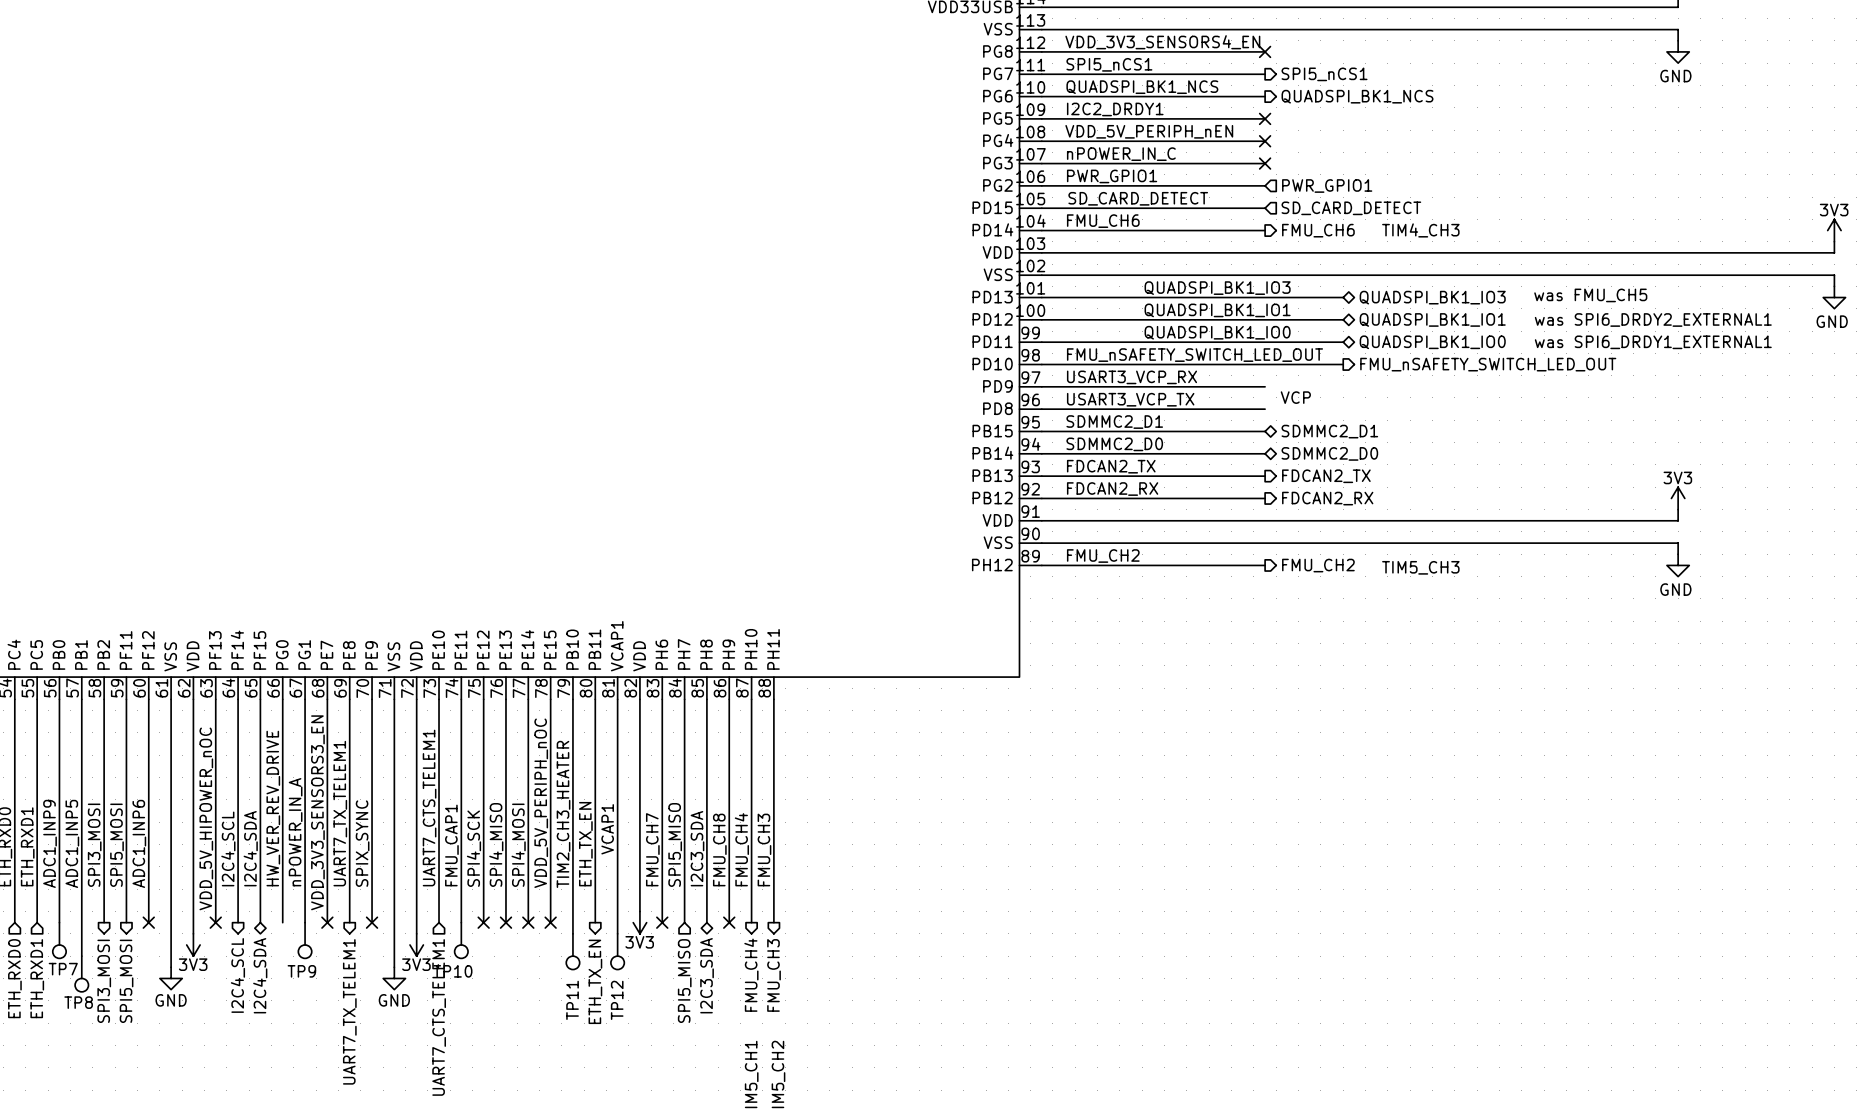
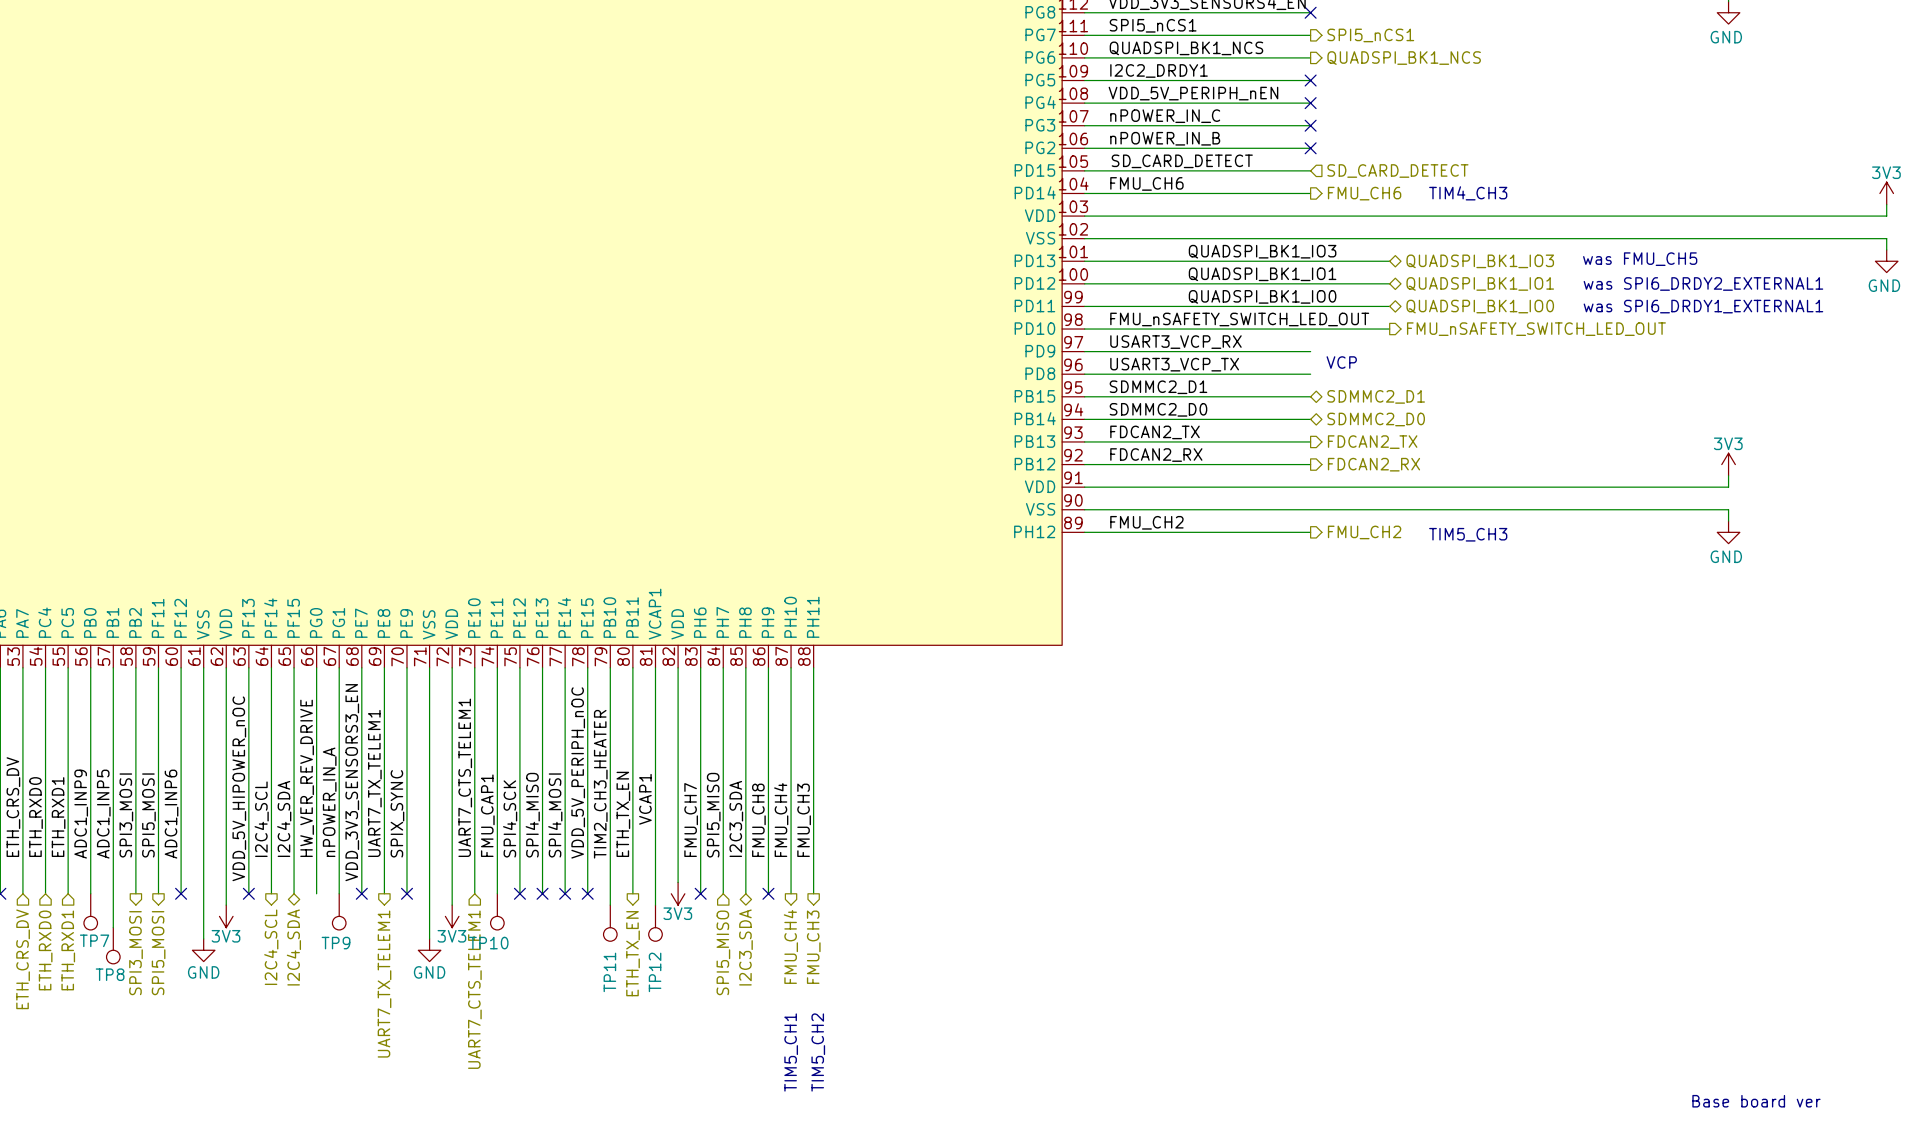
label: PWR_GPIO1 (1112, 176) -> nPOWER_IN_B (1165, 138)
no-connect mark: none -> (1310, 148)
hierarchical label: PWR_GPIO1 (1327, 186) -> none

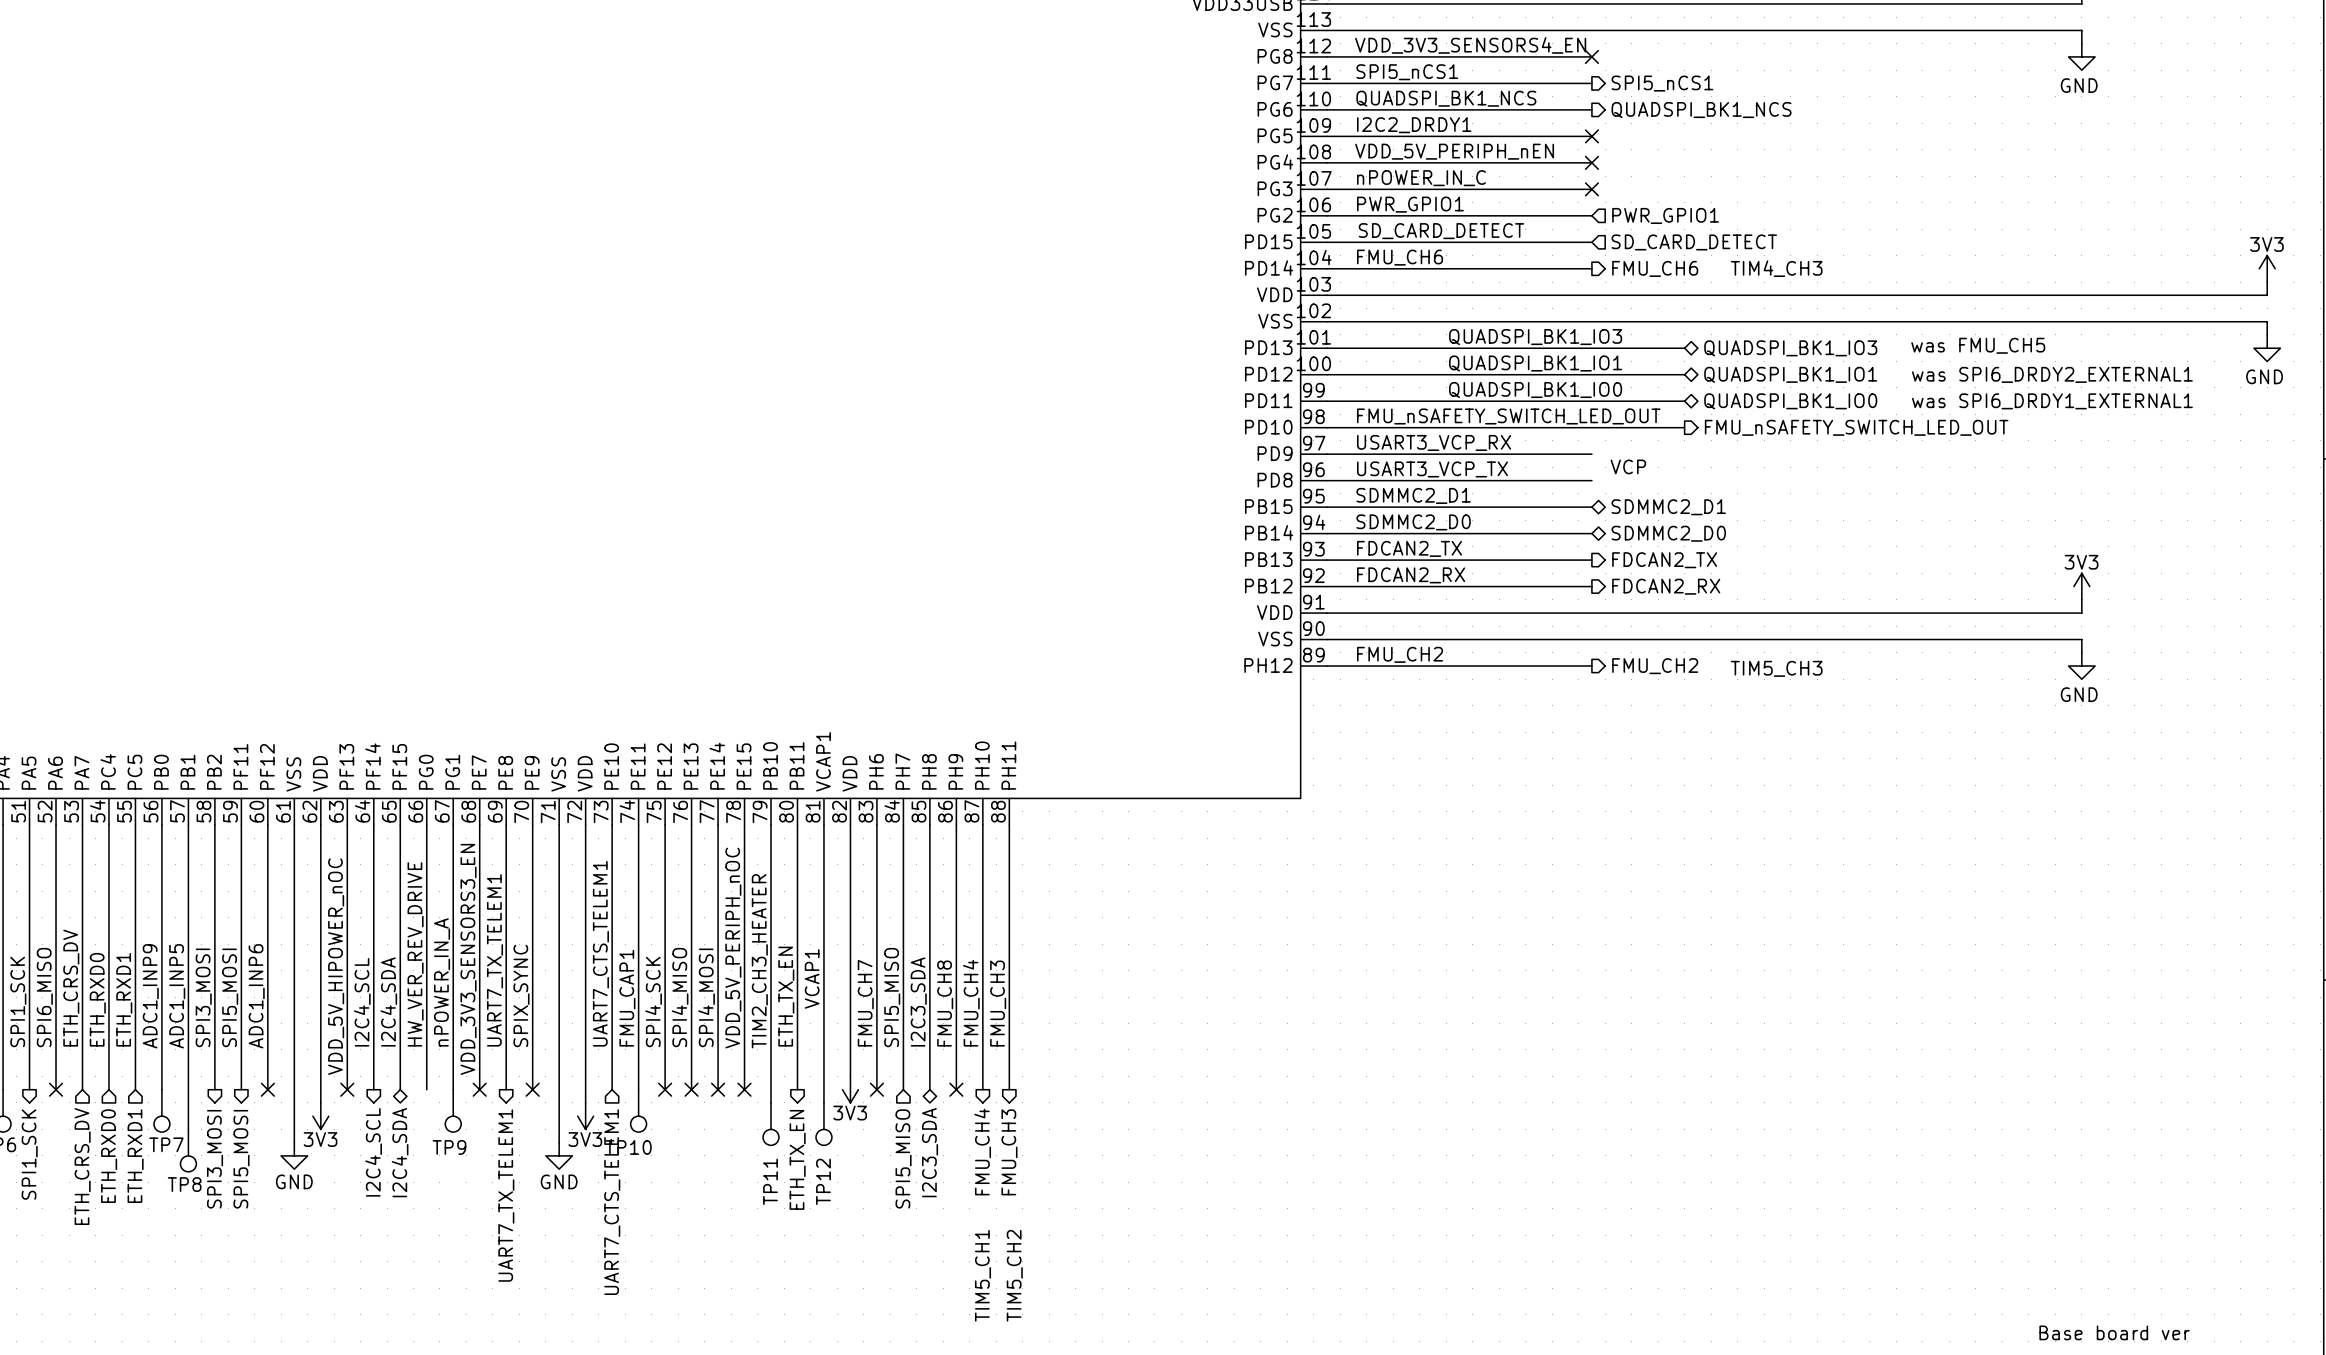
label: nPOWER_IN_B (1165, 138) -> PWR_GPIO1 (1410, 204)
no-connect mark: (1310, 148) -> none
hierarchical label: none -> PWR_GPIO1 (1665, 215)

